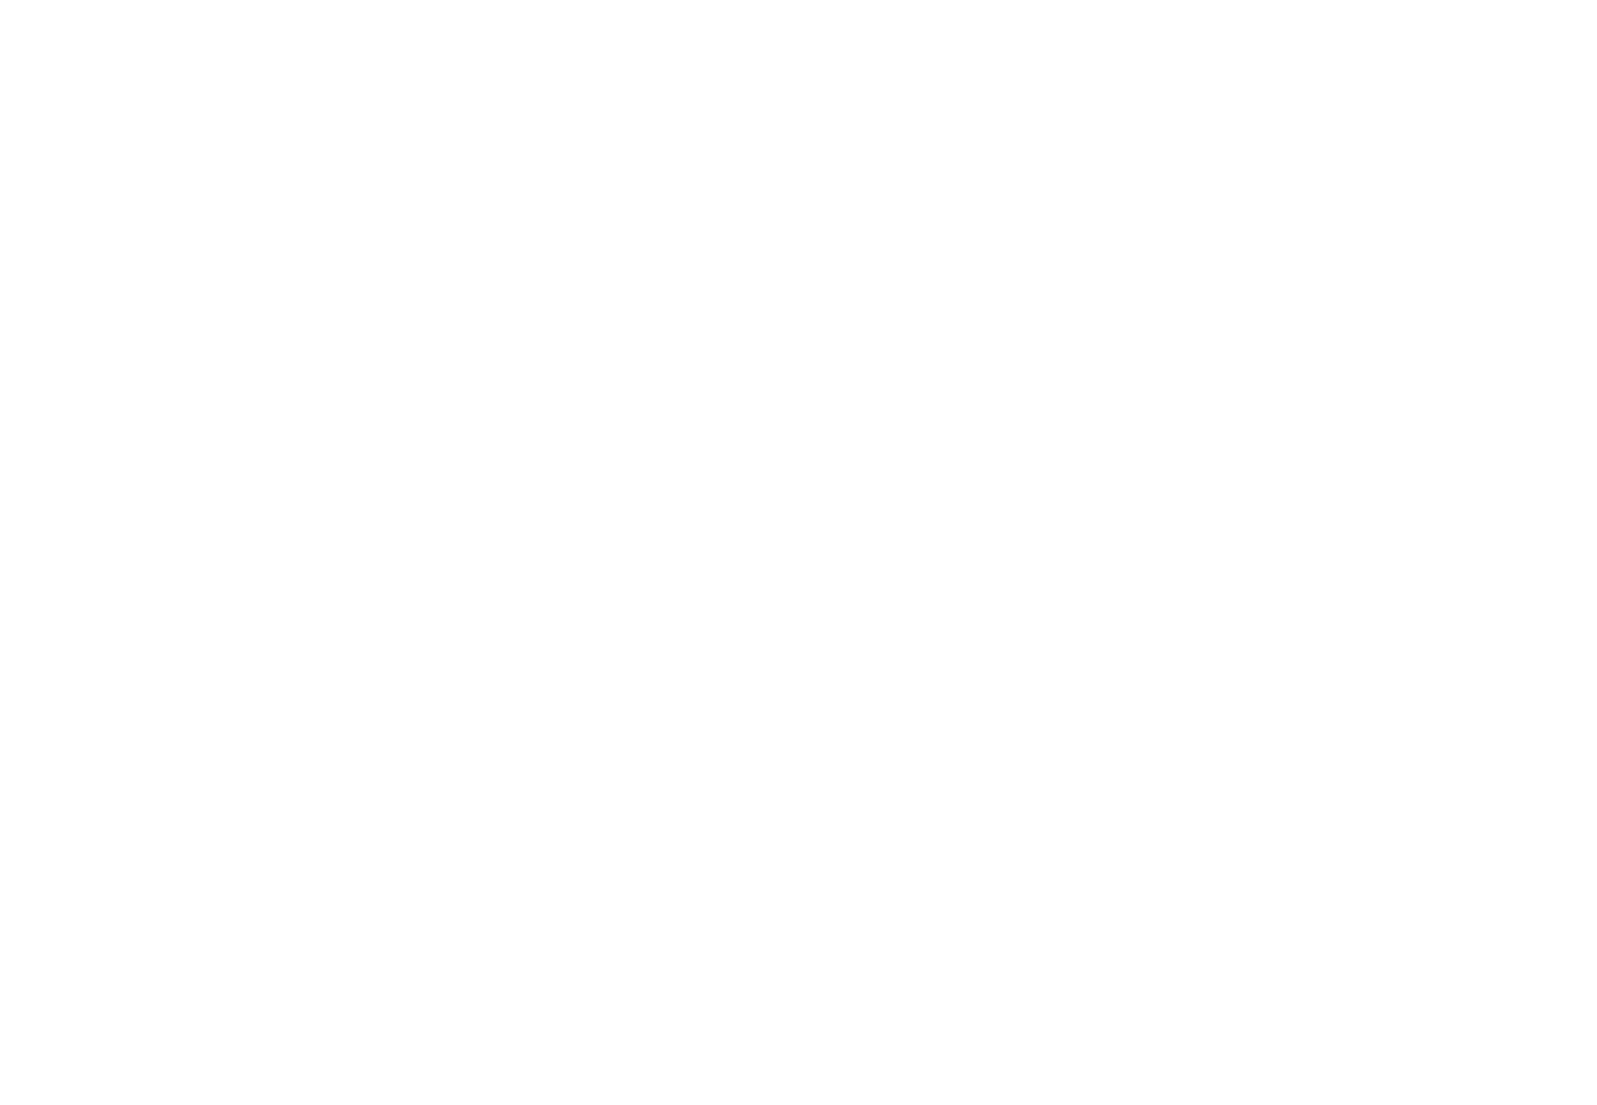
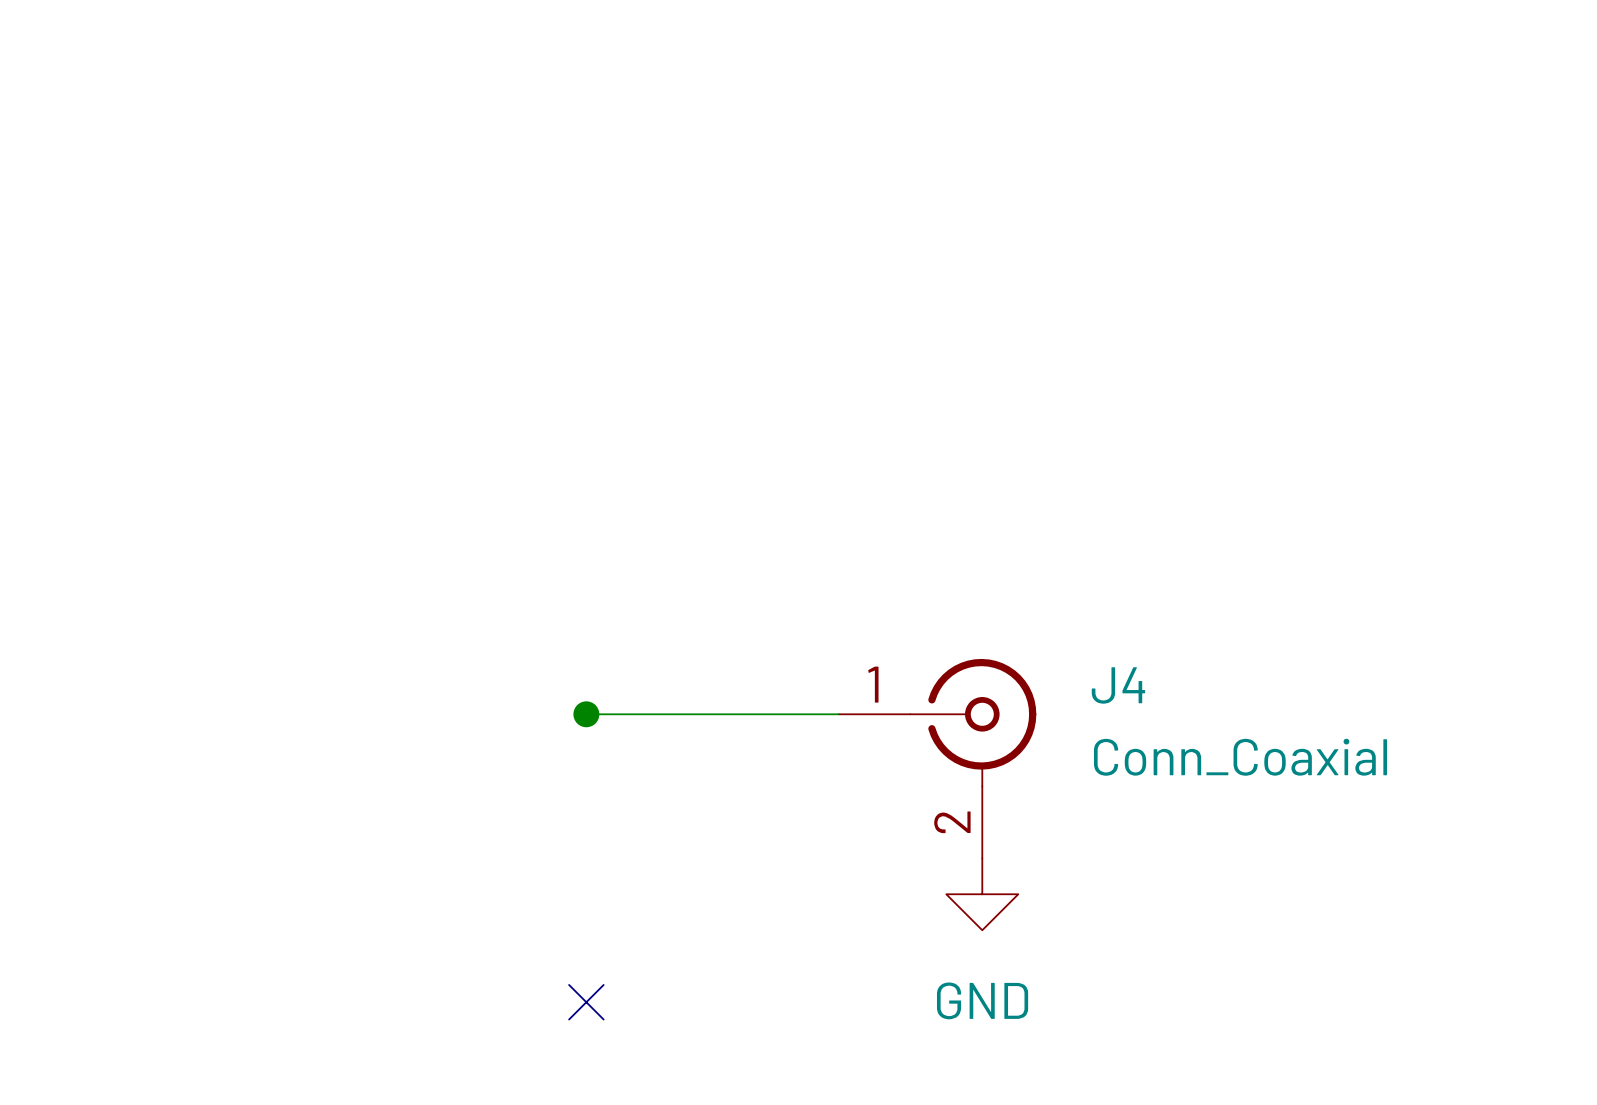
wire: none -> (586, 714) (838, 714)
junction: none -> (586, 714)
J4: none -> Conn_Coaxial (937, 758)
power symbol: none -> GND (982, 894)
no-connect mark: none -> (586, 1002)

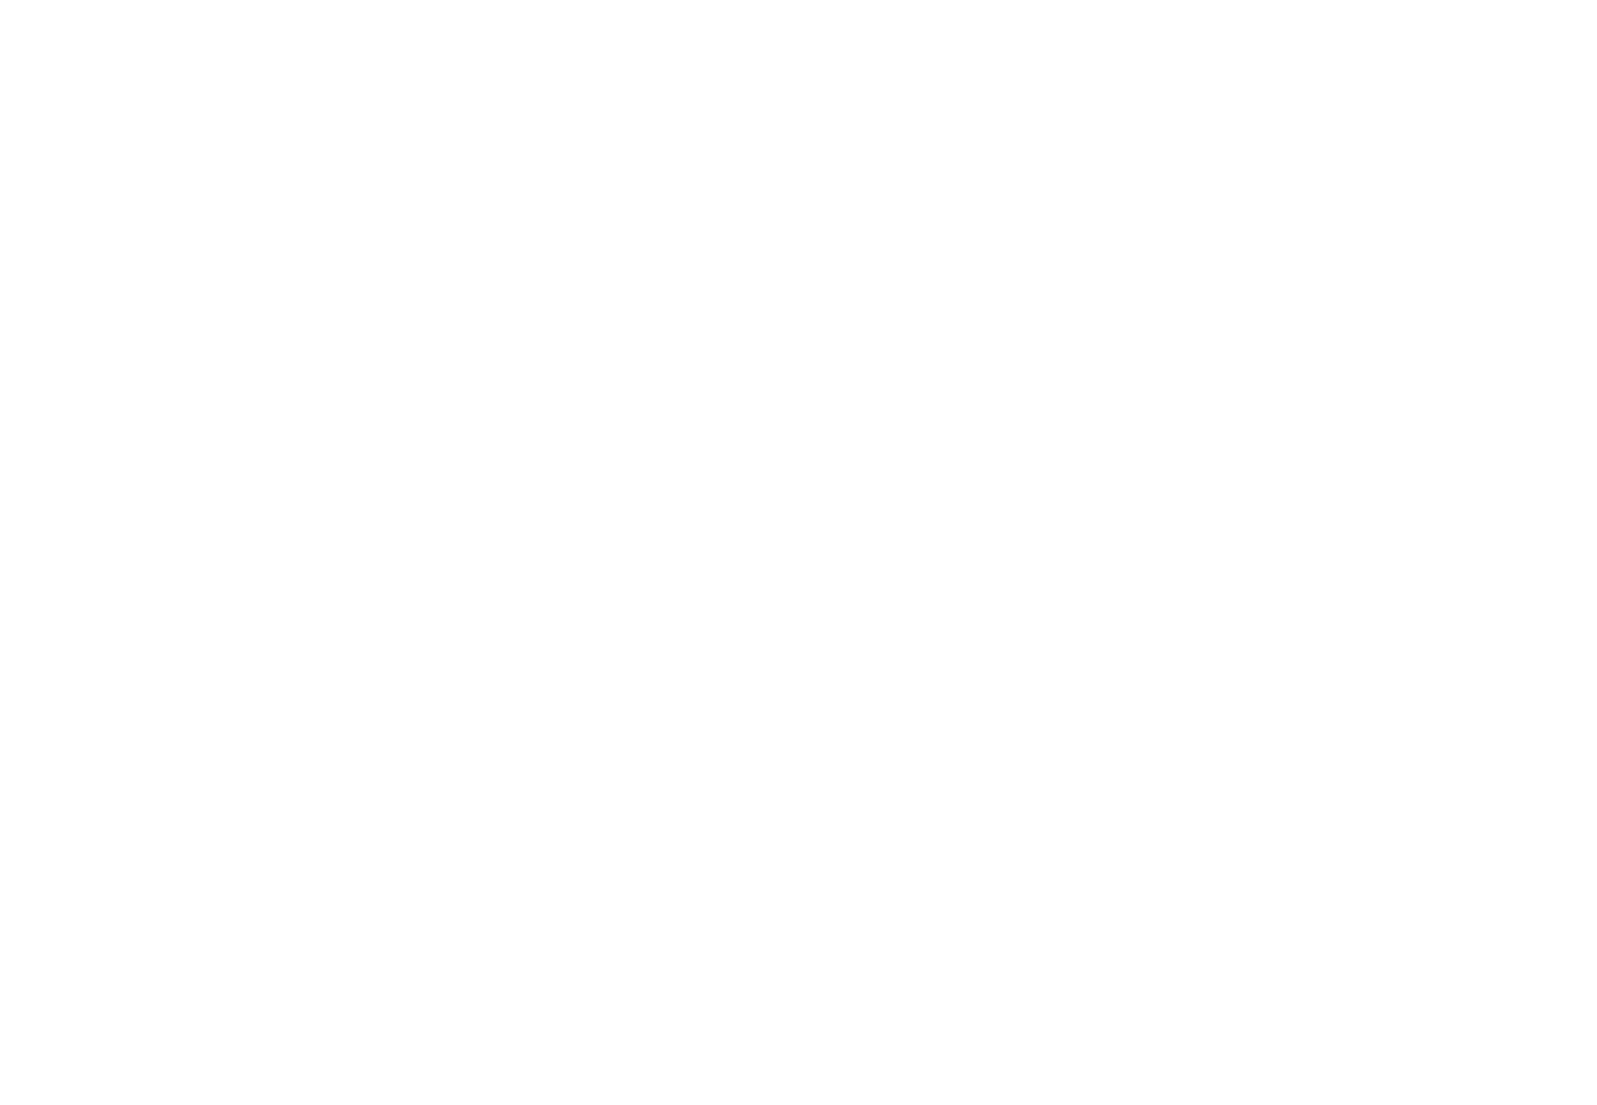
wire: (586, 714) (838, 714) -> none
junction: (586, 714) -> none
J4: Conn_Coaxial (937, 758) -> none
power symbol: GND (982, 894) -> none
no-connect mark: (586, 1002) -> none

